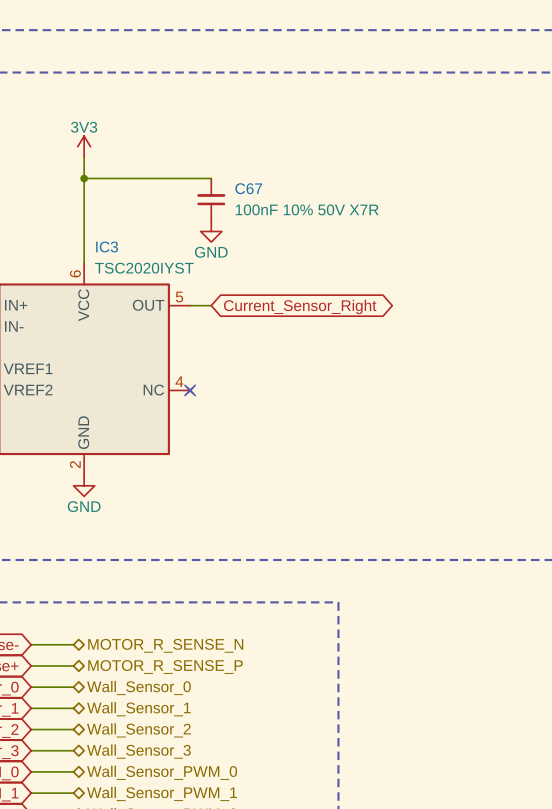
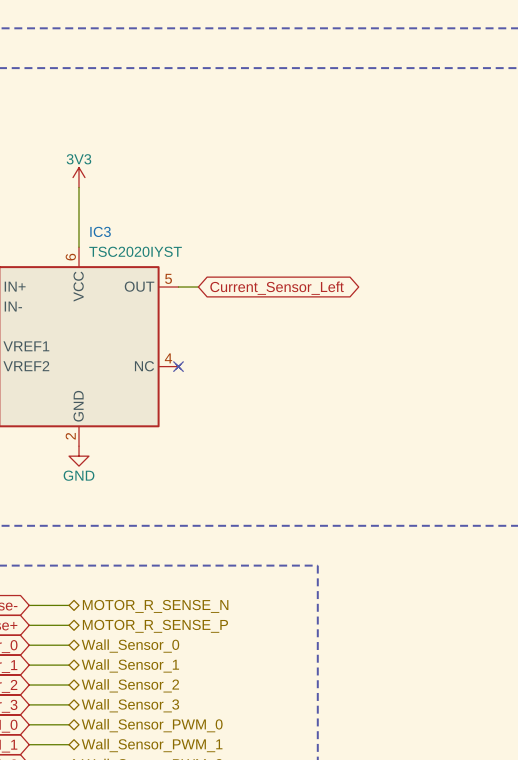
power symbol position: 3V3 (84, 146) -> 3V3 (79, 177)
wire: (84, 178) (211, 178) -> none
junction: (84, 178) -> none
C67: 100nF 10% 50V X7R (211, 199) -> none
power symbol: GND (211, 231) -> none
global label: Current_Sensor_Right (300, 306) -> Current_Sensor_Left (277, 288)

